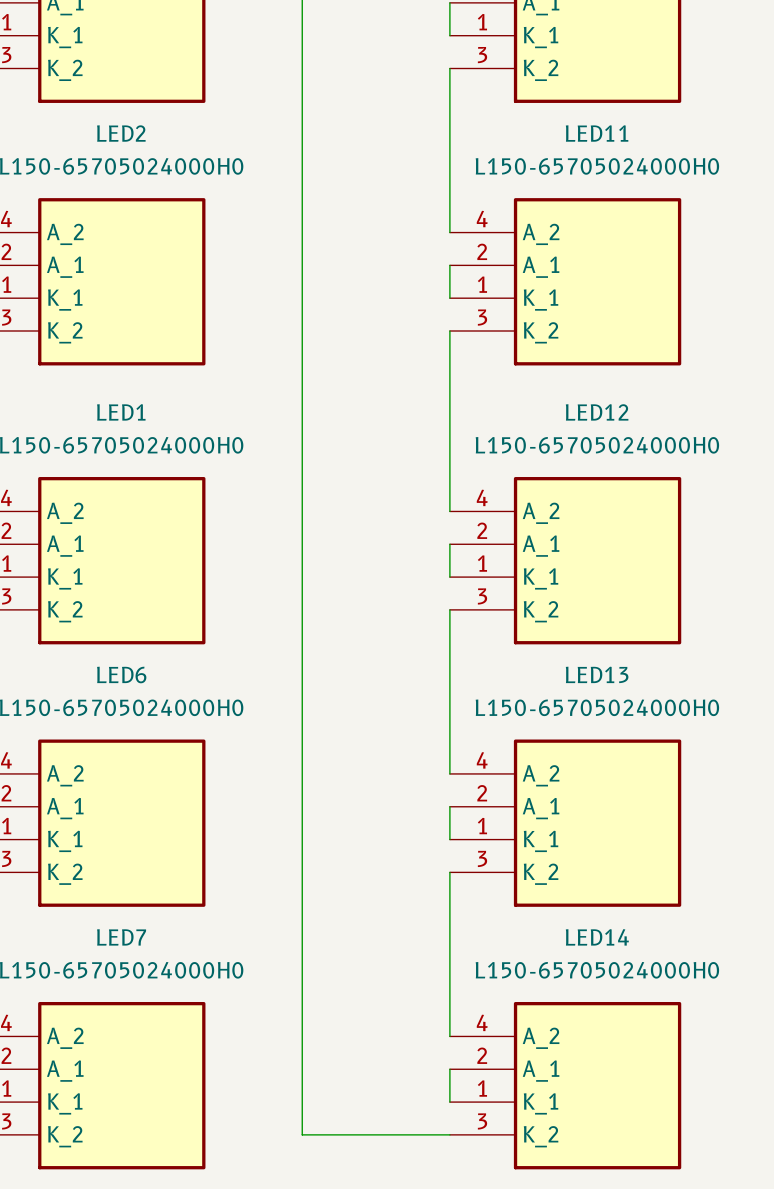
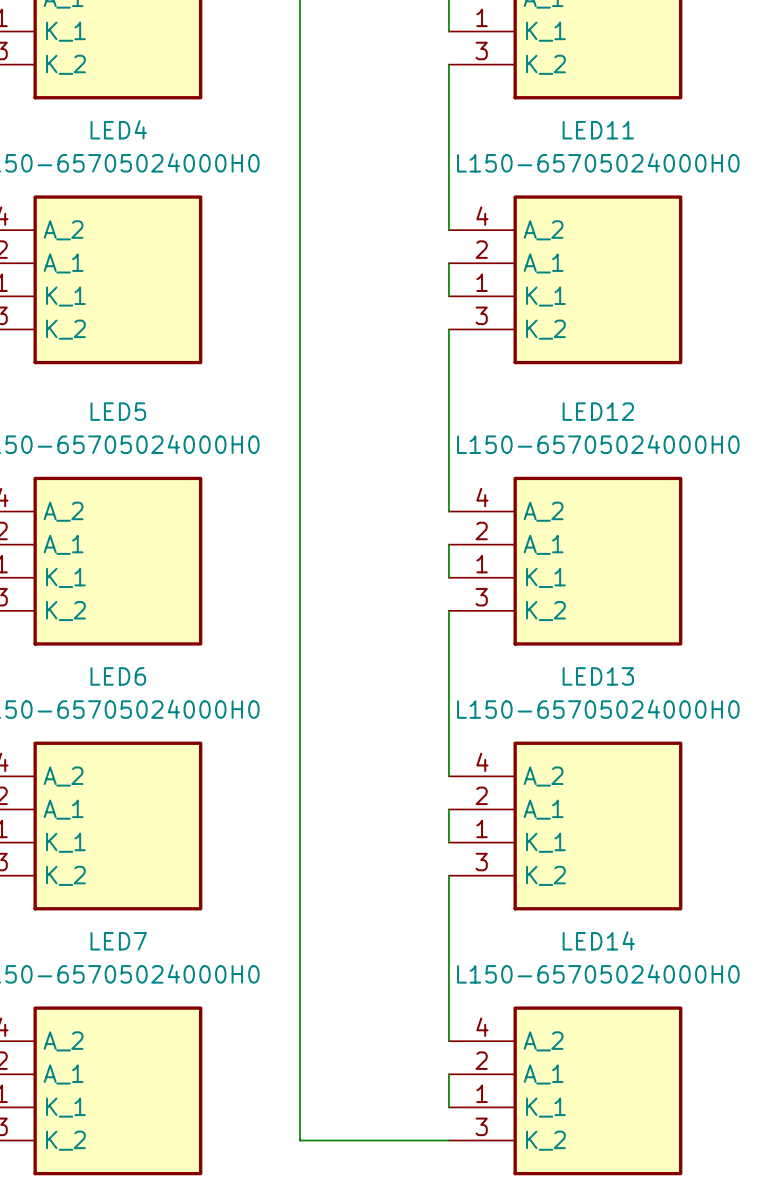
LED2 name: LED2 (121, 133) -> LED4 (118, 129)
LED1 name: LED1 (121, 412) -> LED5 (118, 411)

